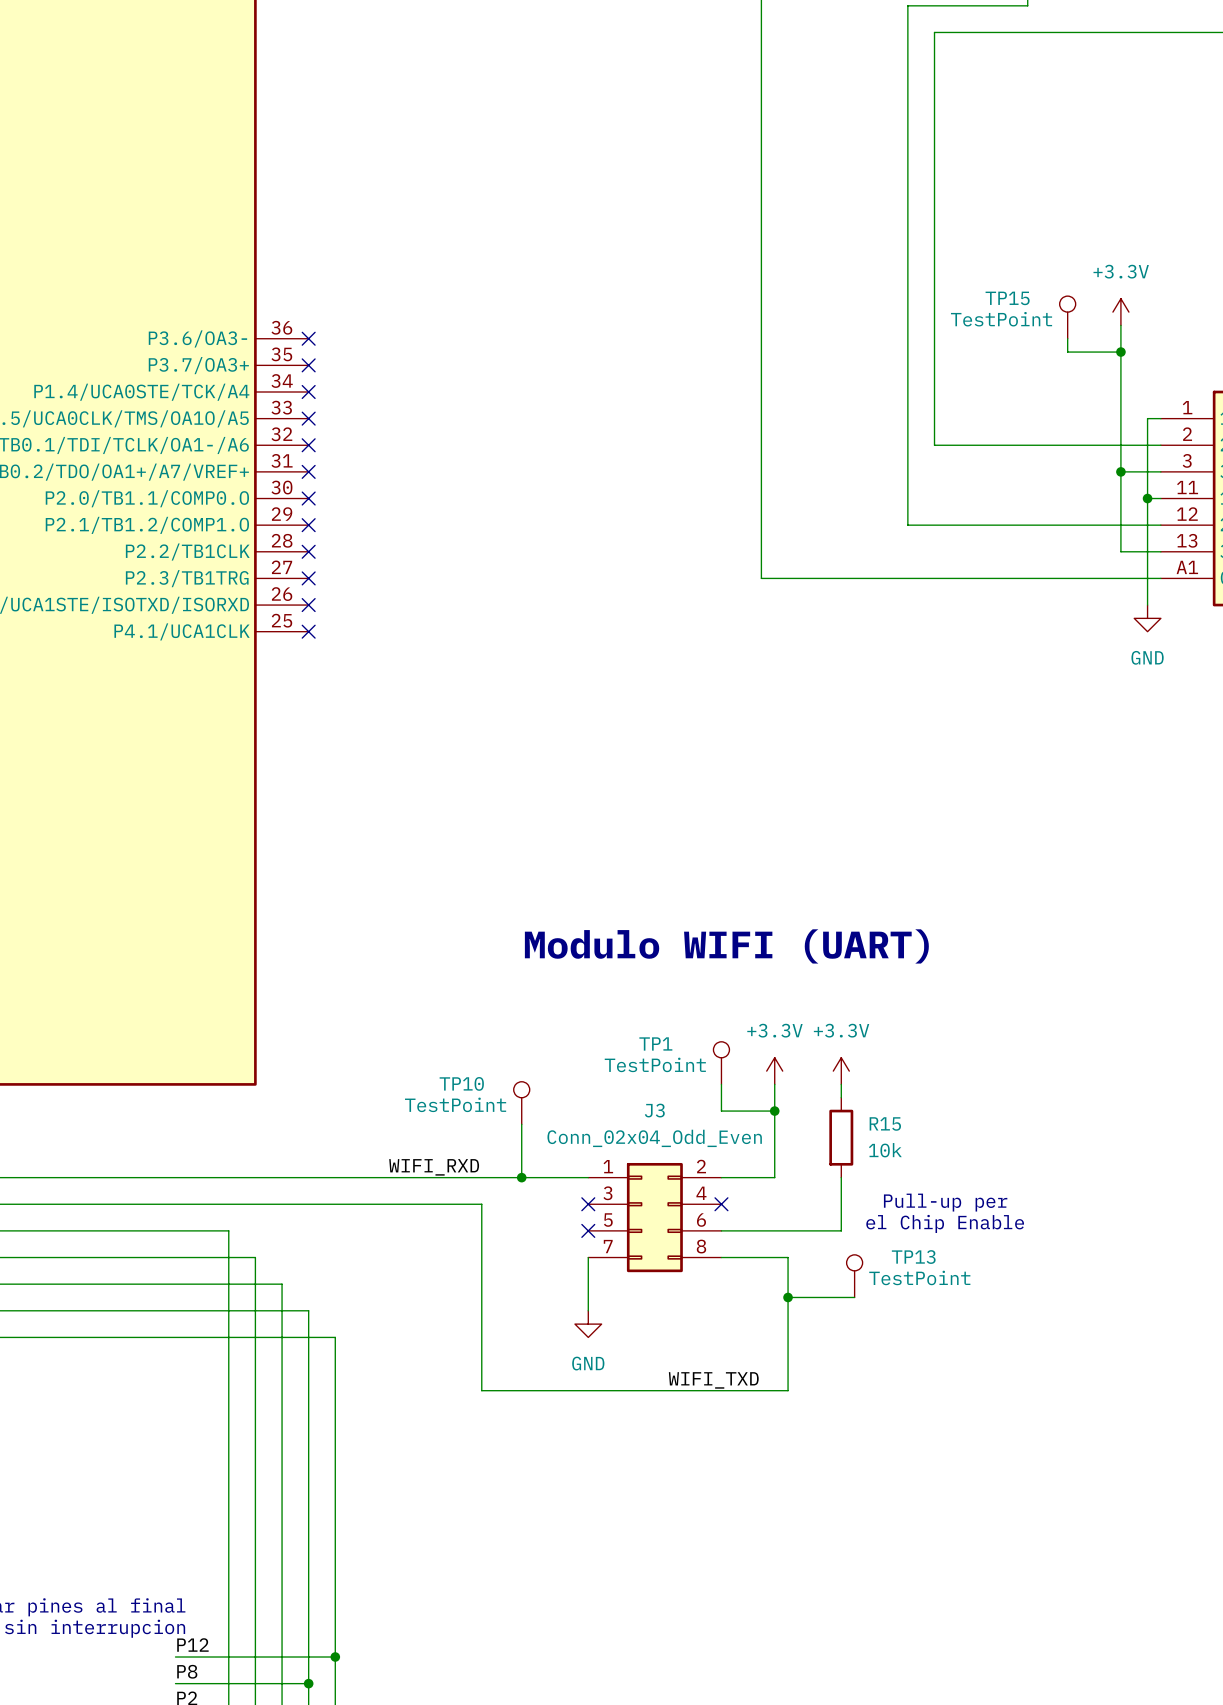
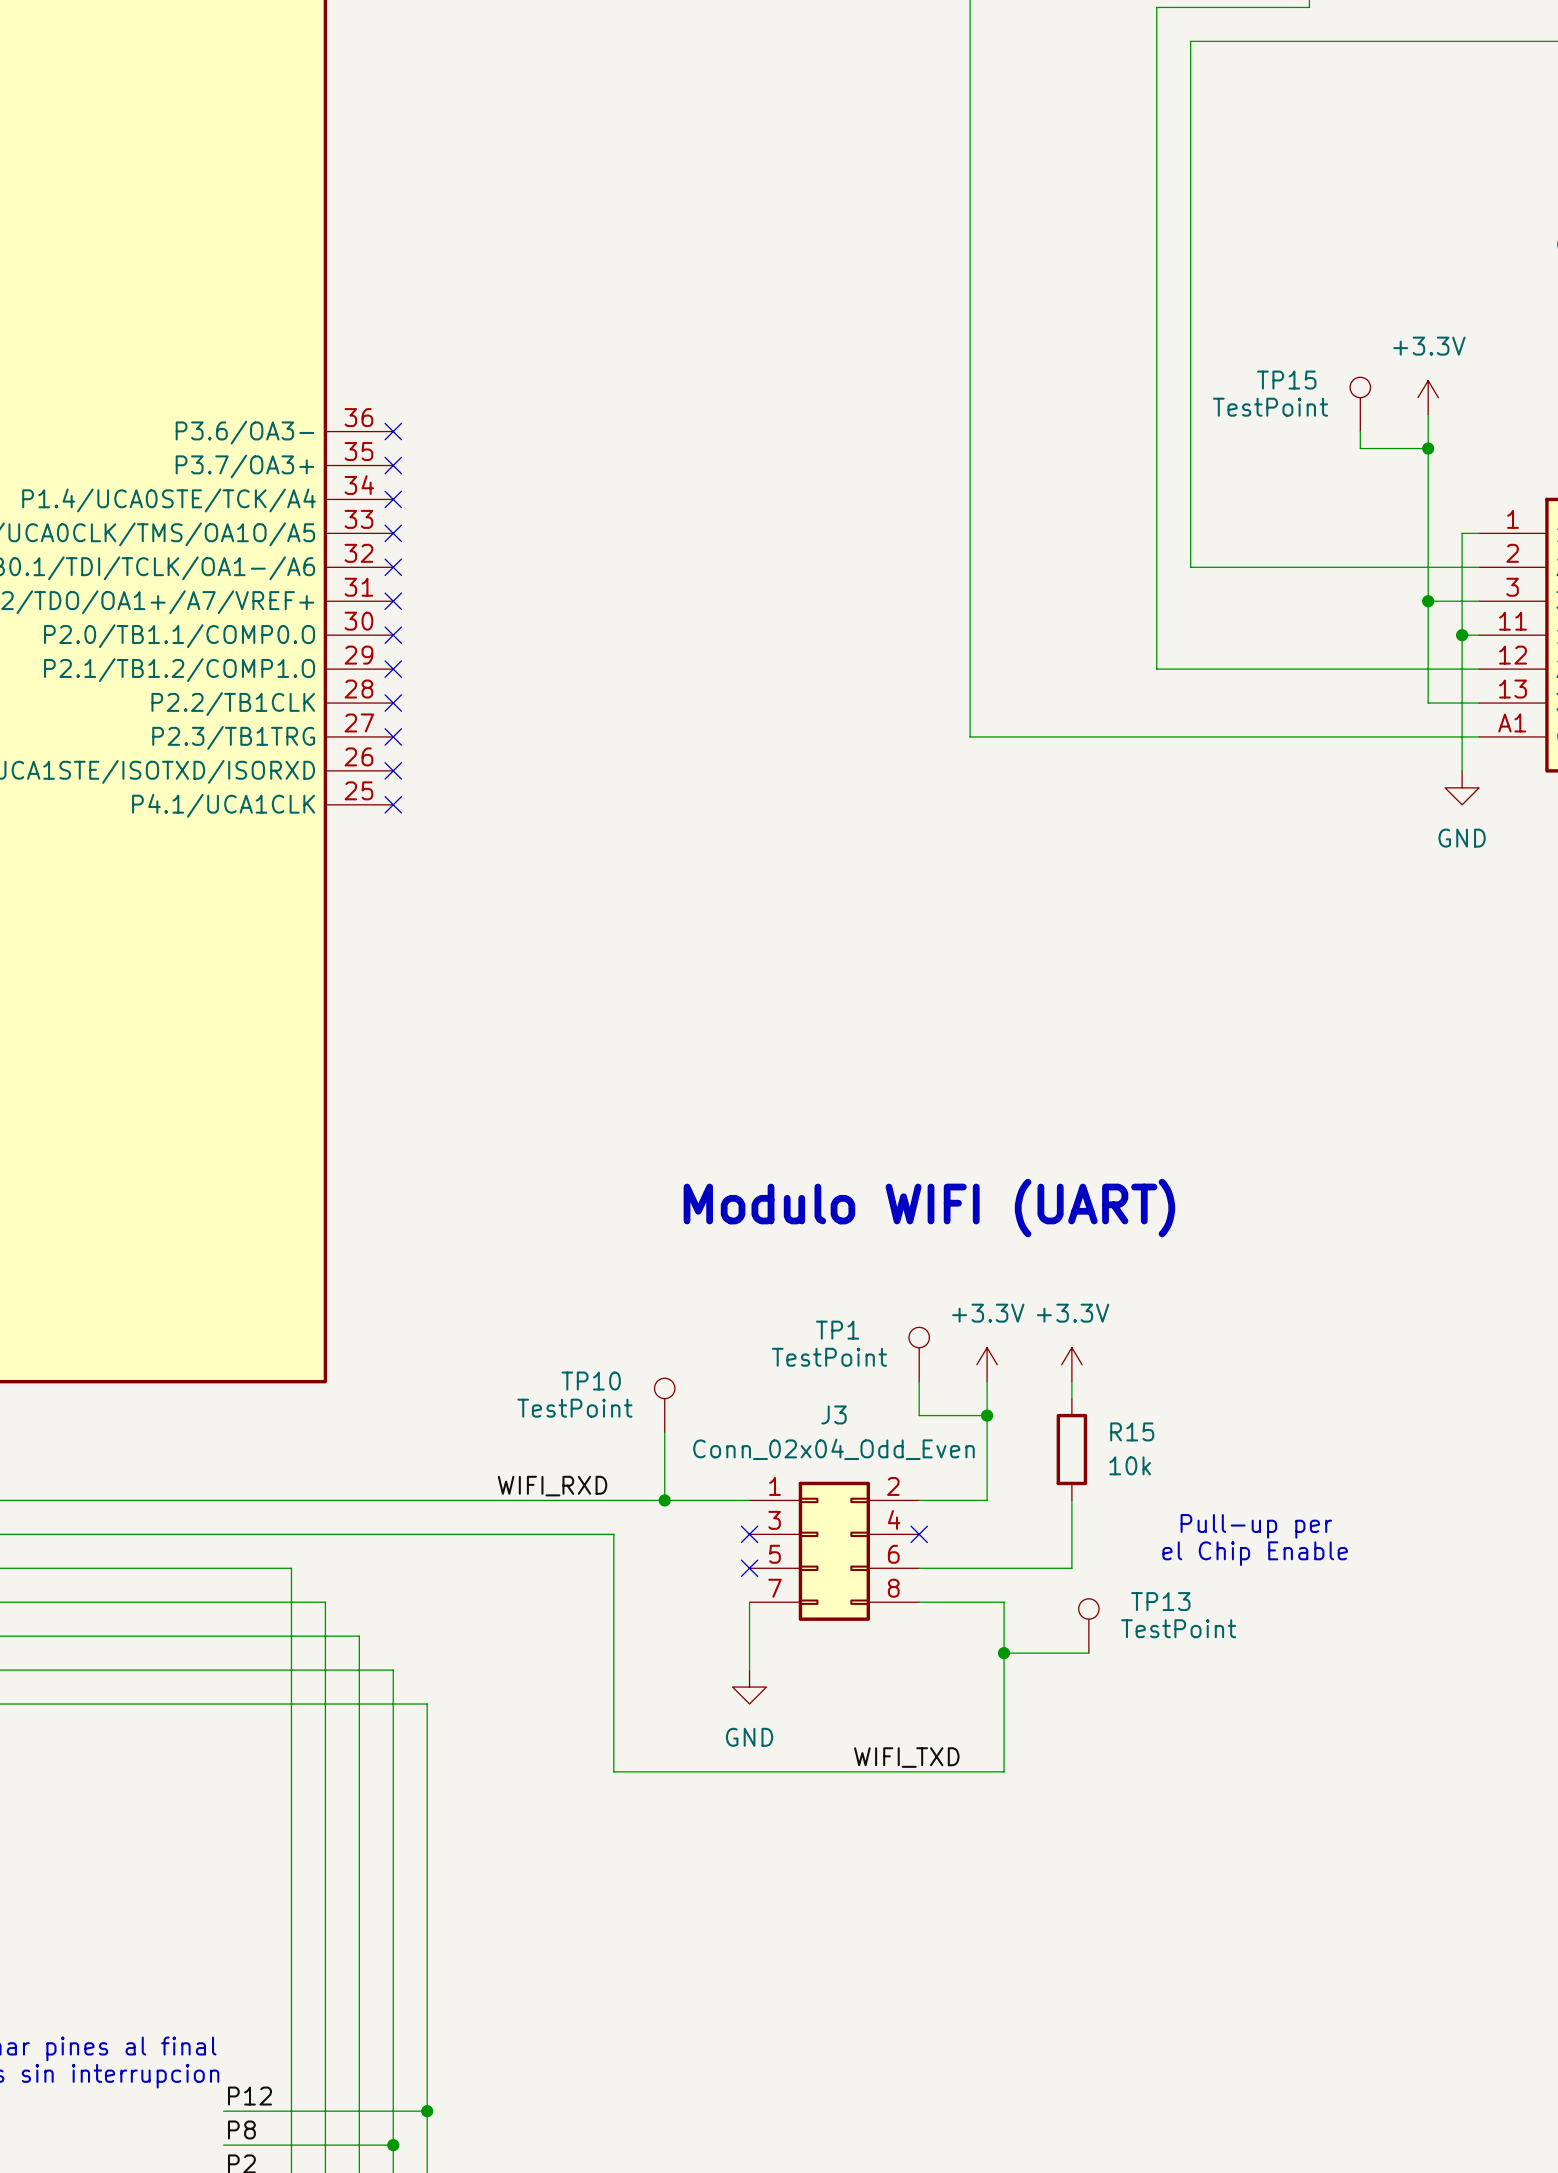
text position: Pull-up per (945, 1202) -> Pull-up per (1256, 1526)
text position: el Chip Enable (945, 1223) -> el Chip Enable (1255, 1553)

